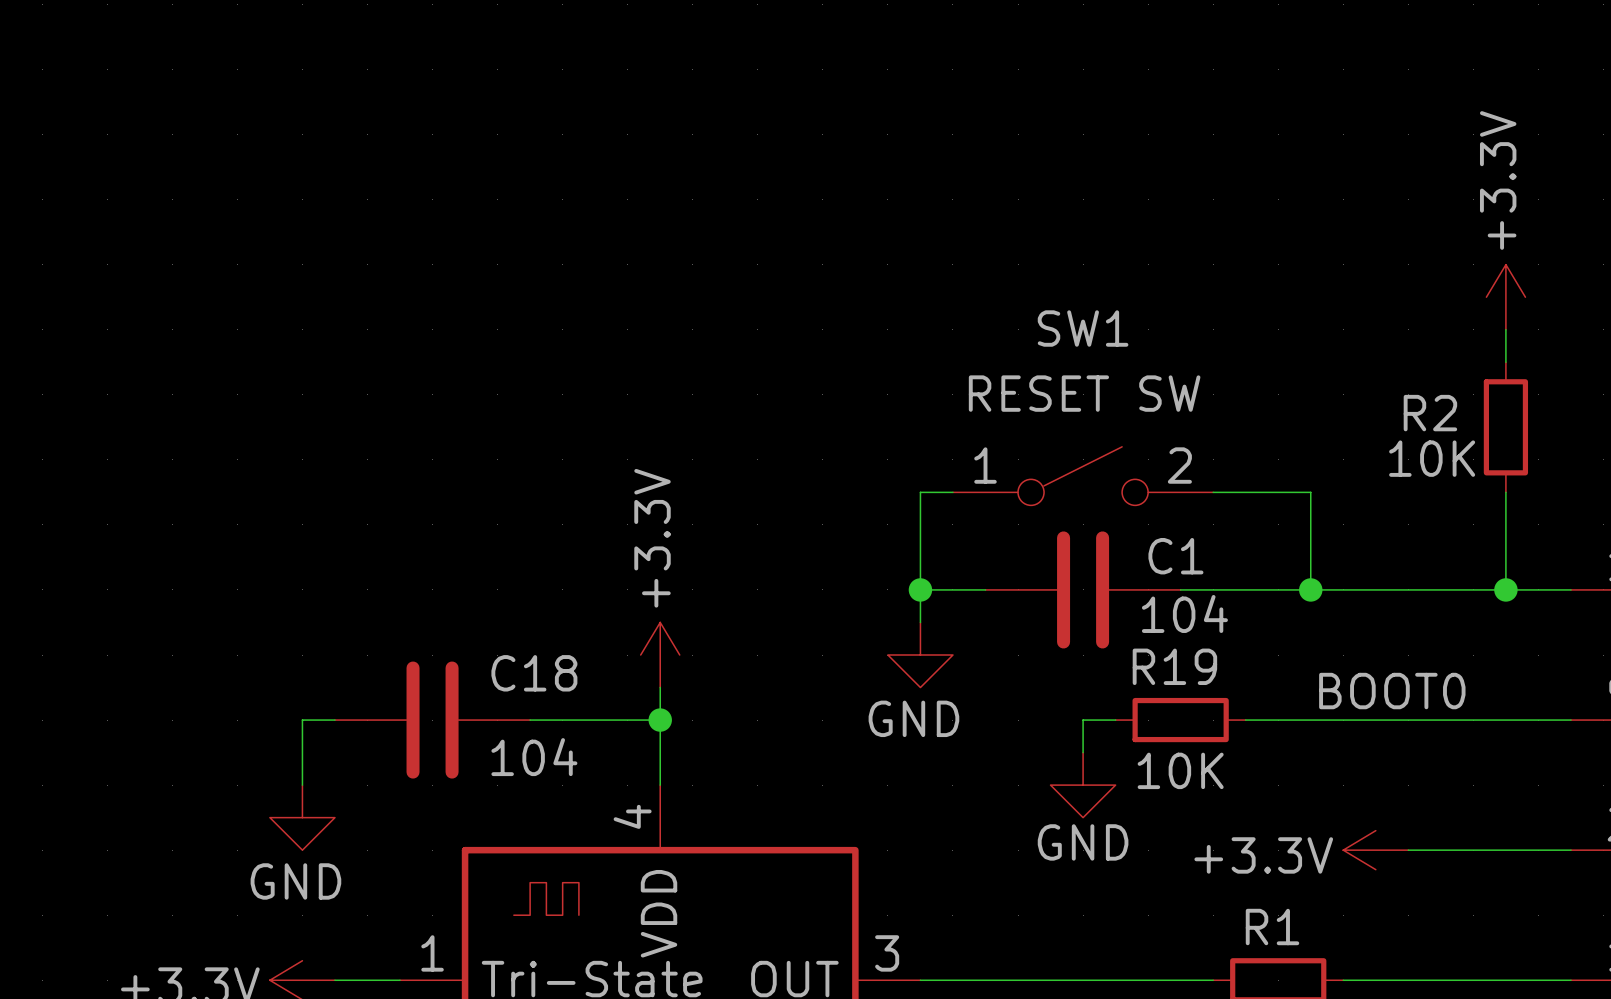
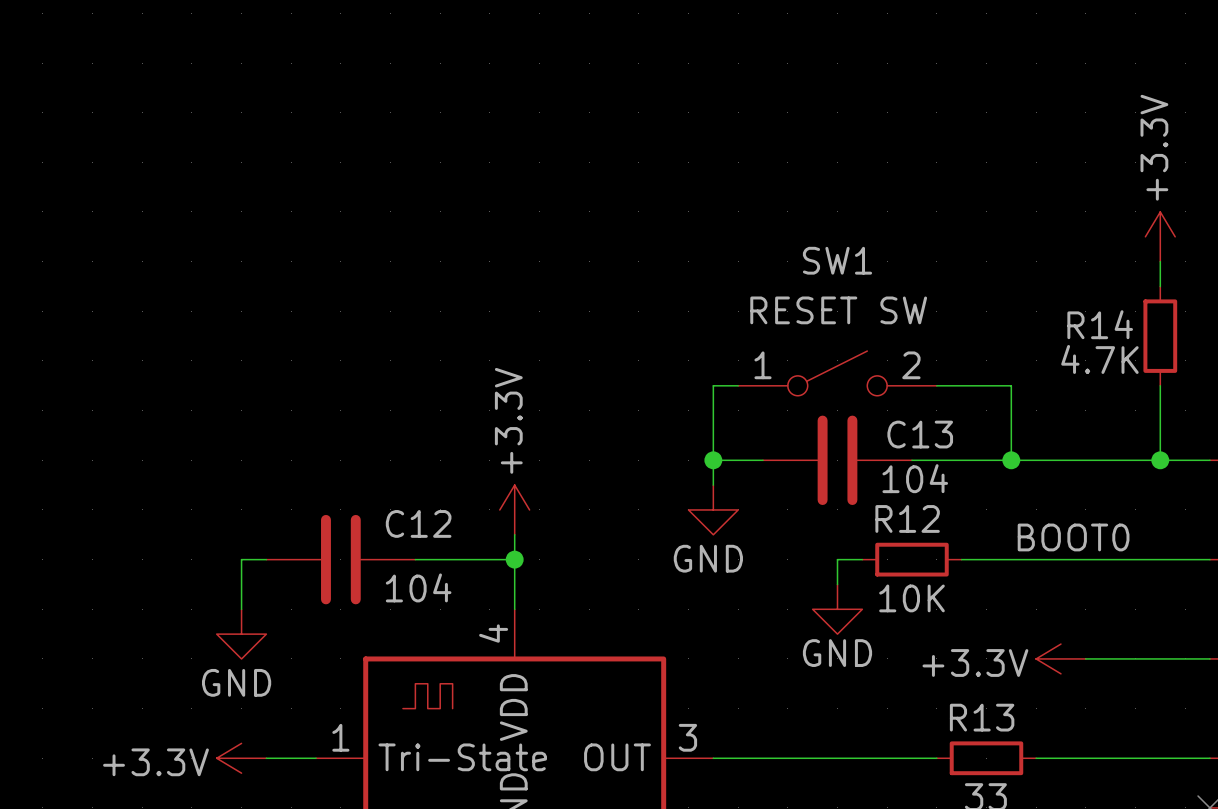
R2 name: R2 (1430, 413) -> R14 (1100, 324)
R2 value: 10K (1432, 458) -> 4.7K (1099, 359)
C1 name: C1 (1175, 556) -> C13 (920, 434)
R19 name: R19 (1174, 666) -> R12 (907, 518)
C18 name: C18 (534, 673) -> C12 (418, 523)
R1 name: R1 (1272, 927) -> R13 (982, 717)

